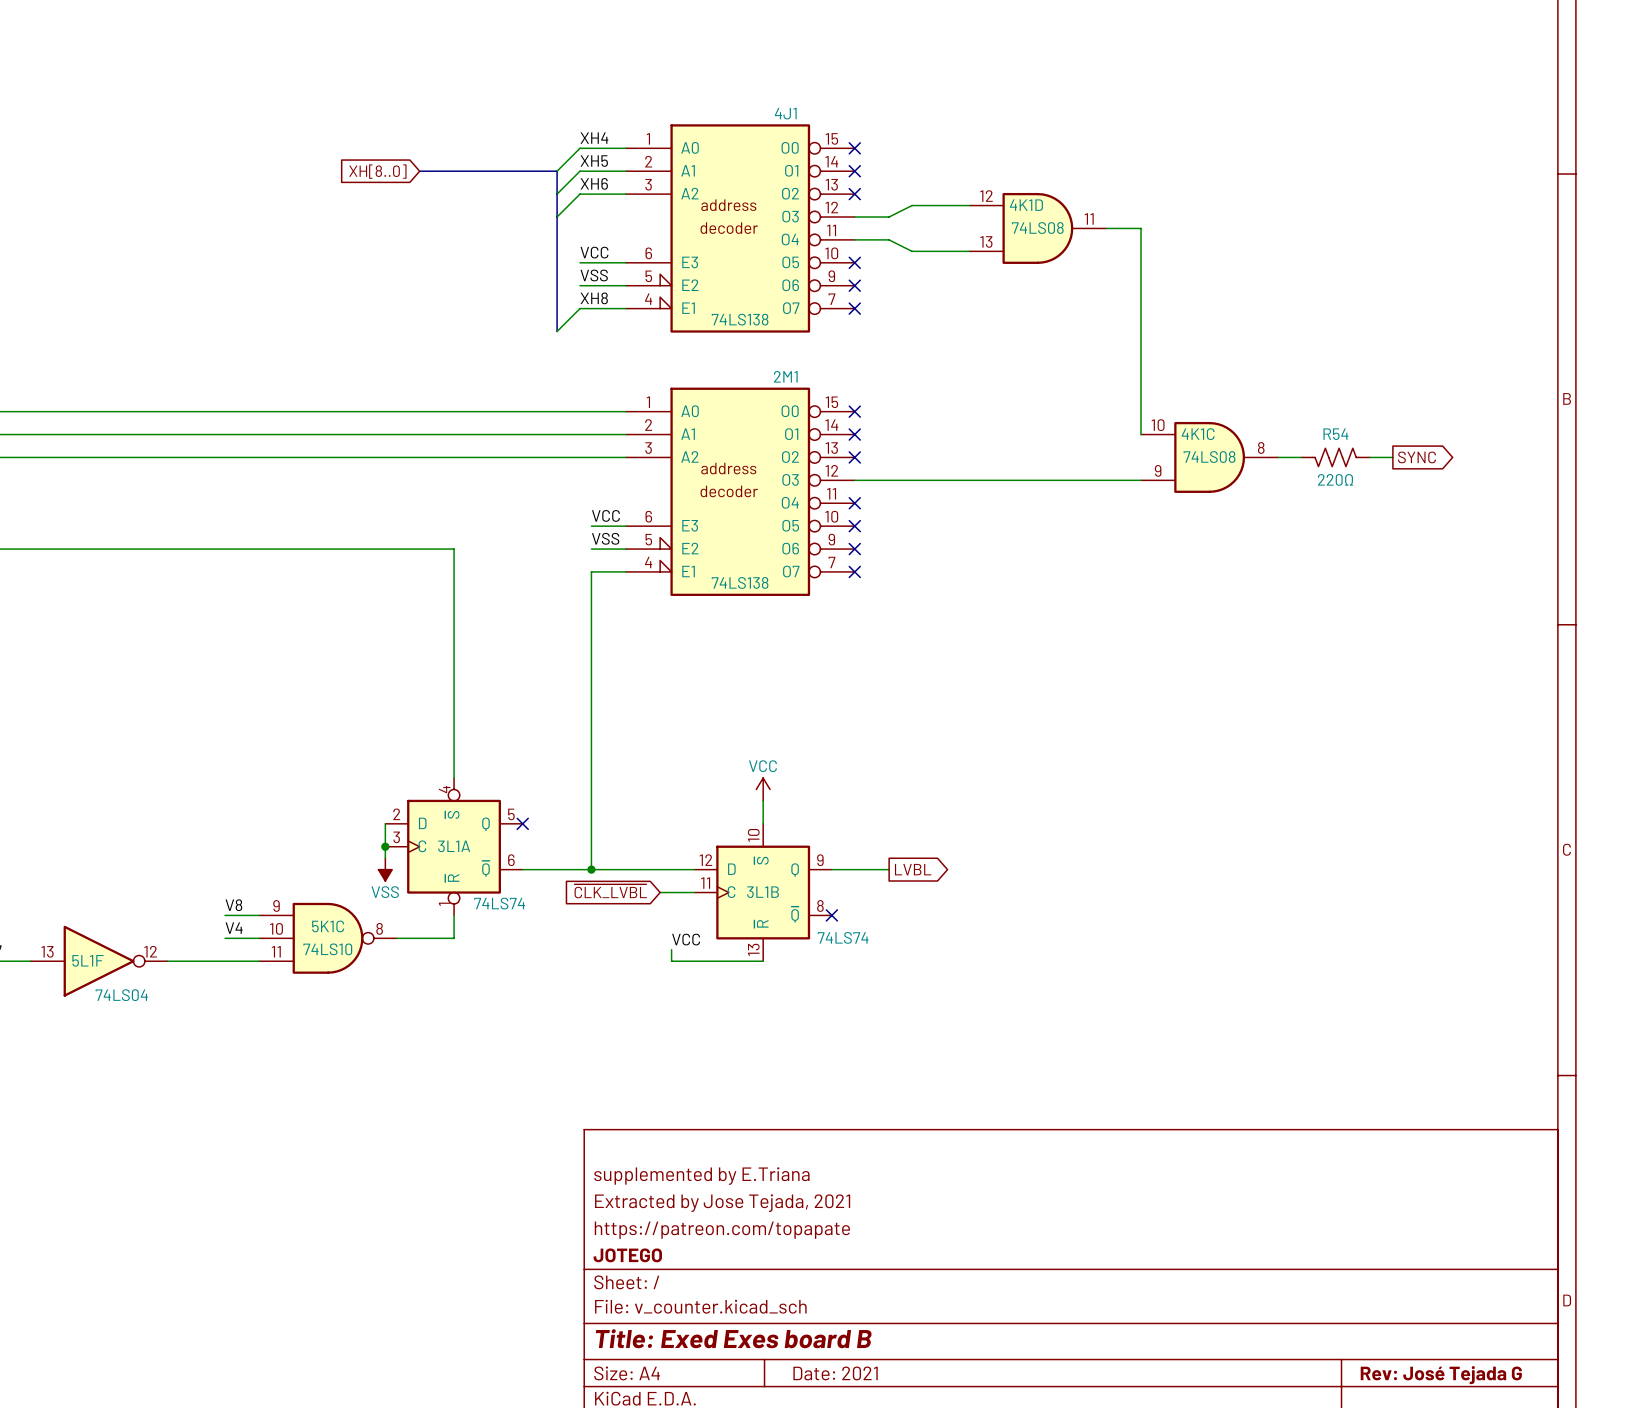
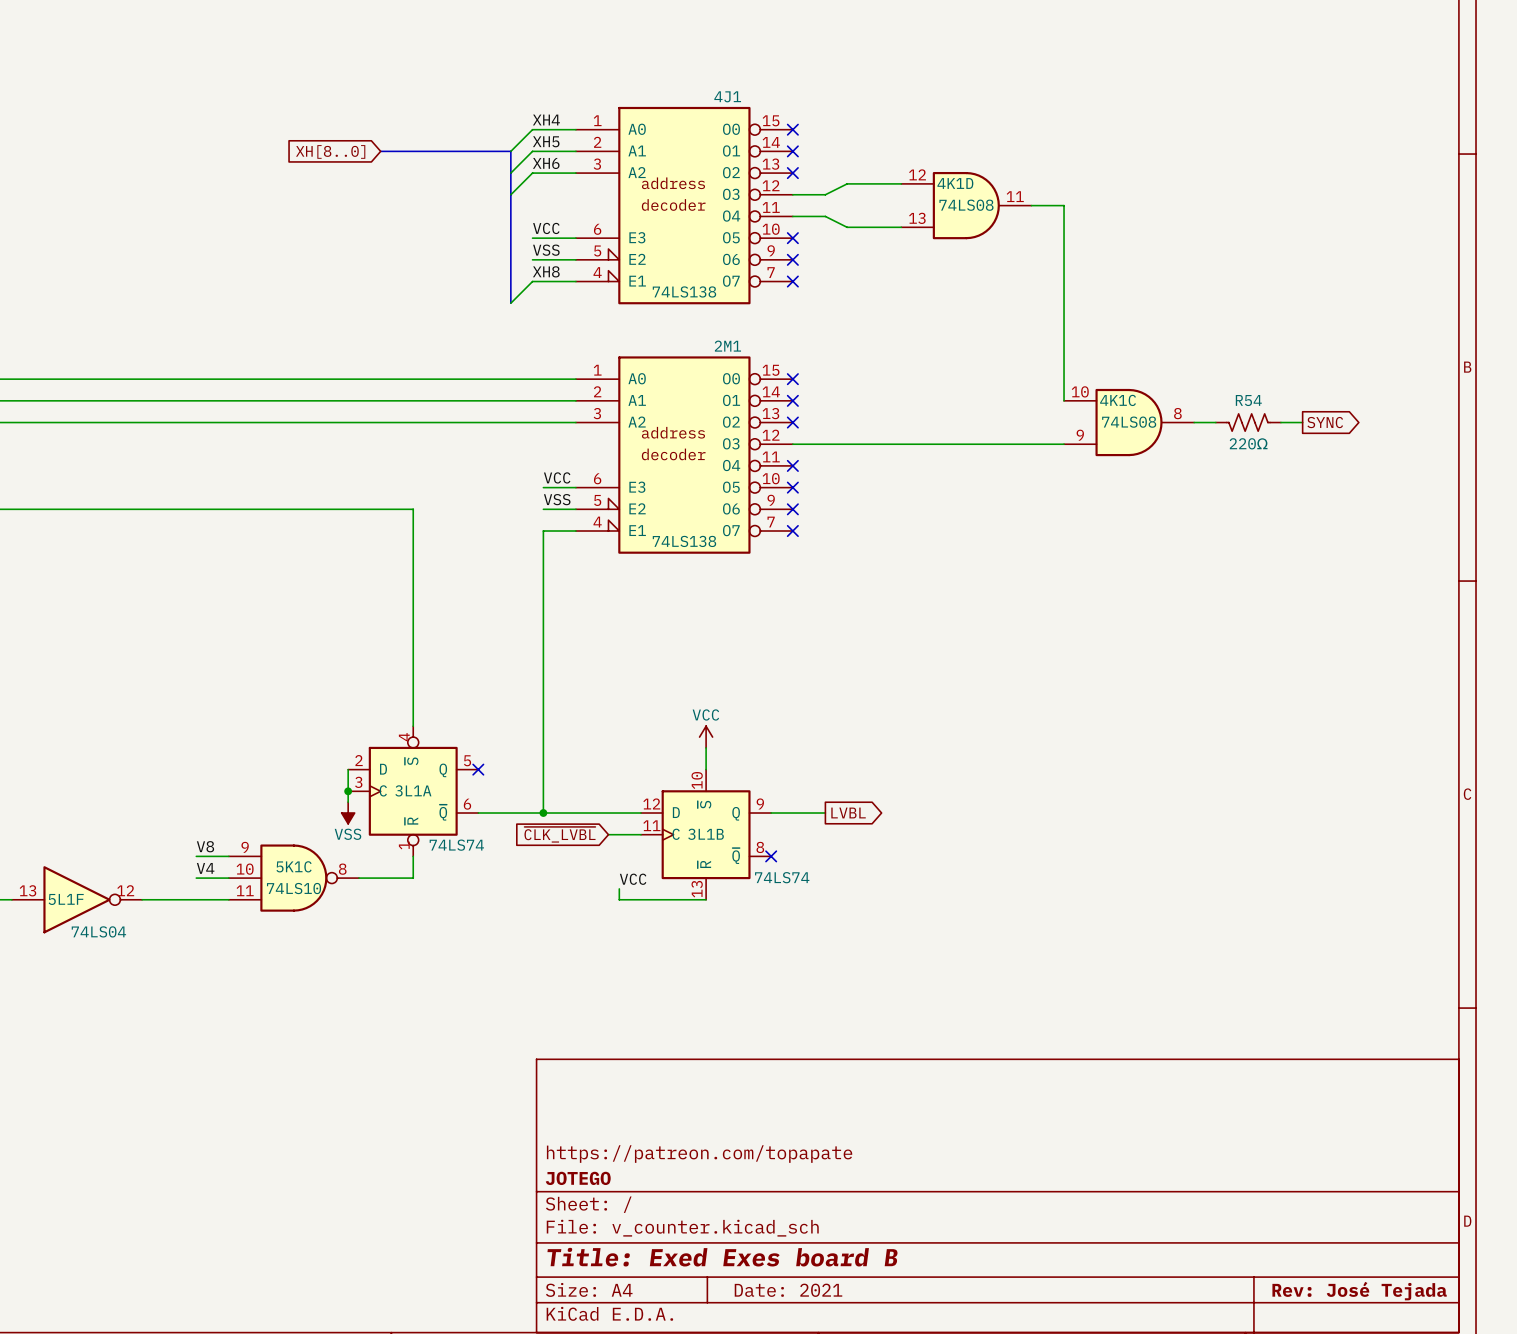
title block: supplemented by E.Triana (701, 1176) -> none
title block: Extracted by Jose Tejada, 2021 (722, 1203) -> none
title block: Rev: José Tejada G (1441, 1375) -> Rev: José Tejada (1359, 1291)

